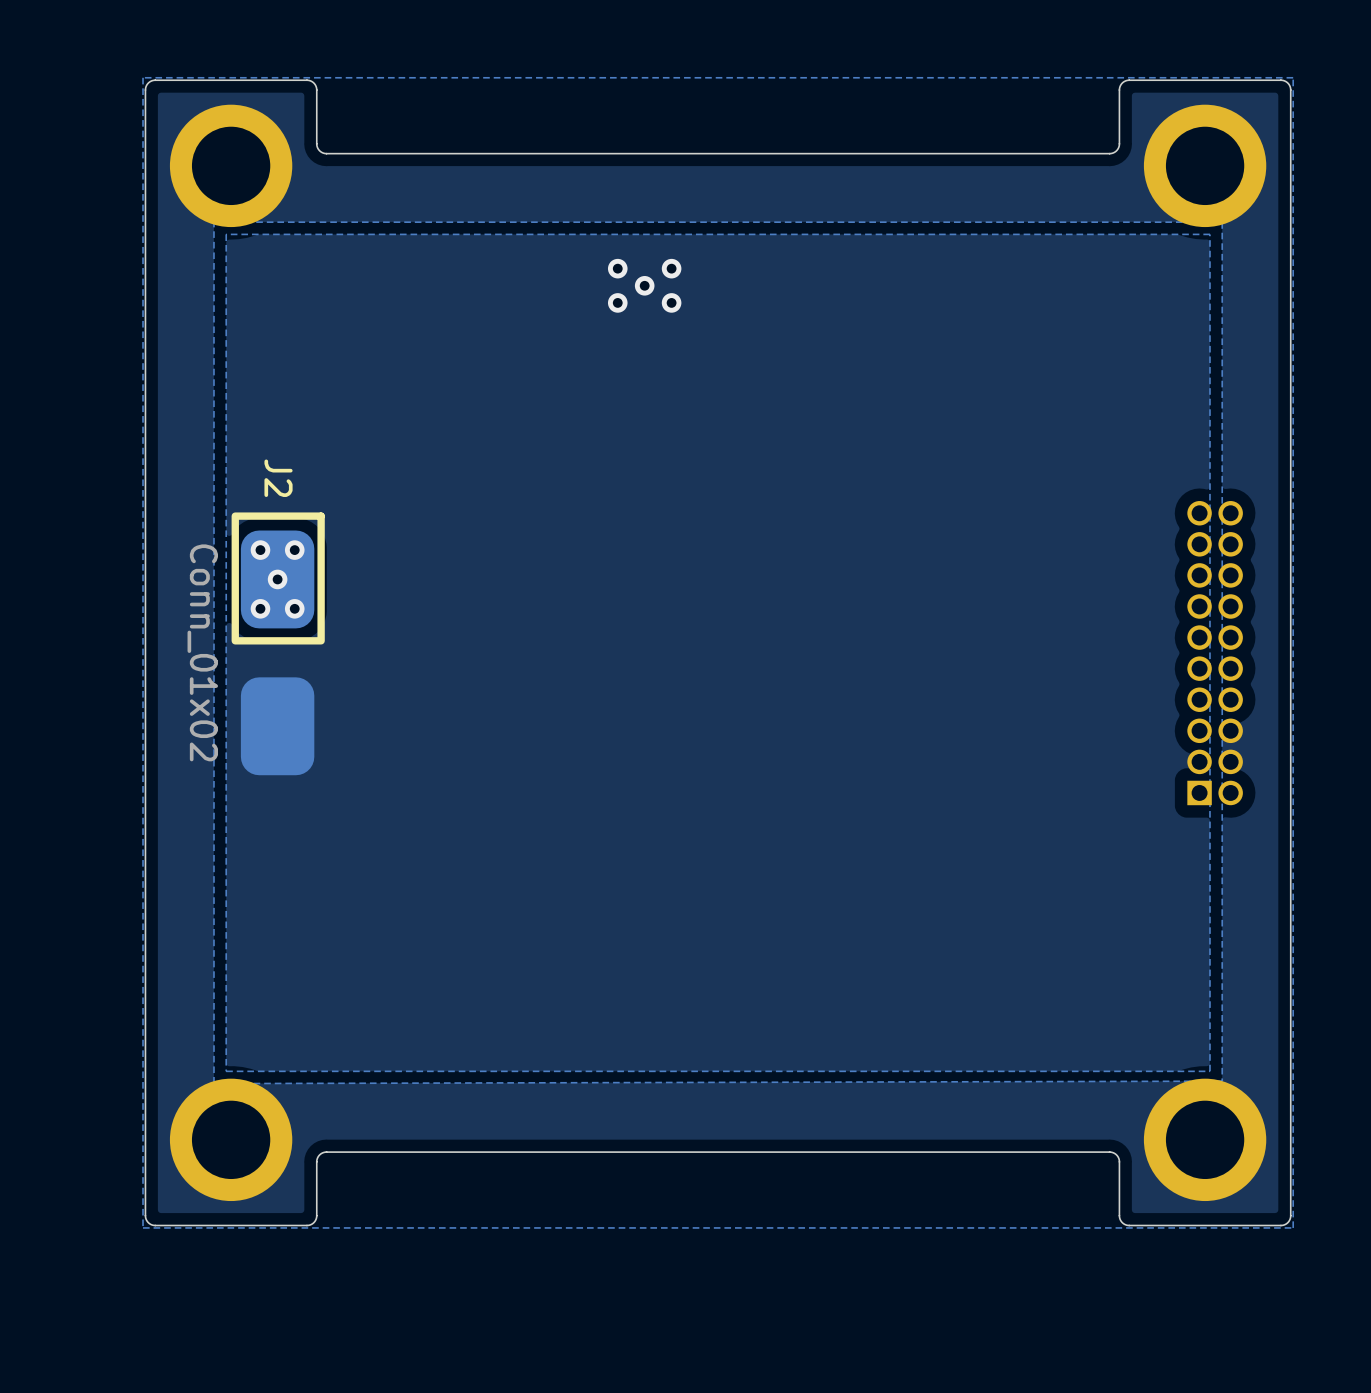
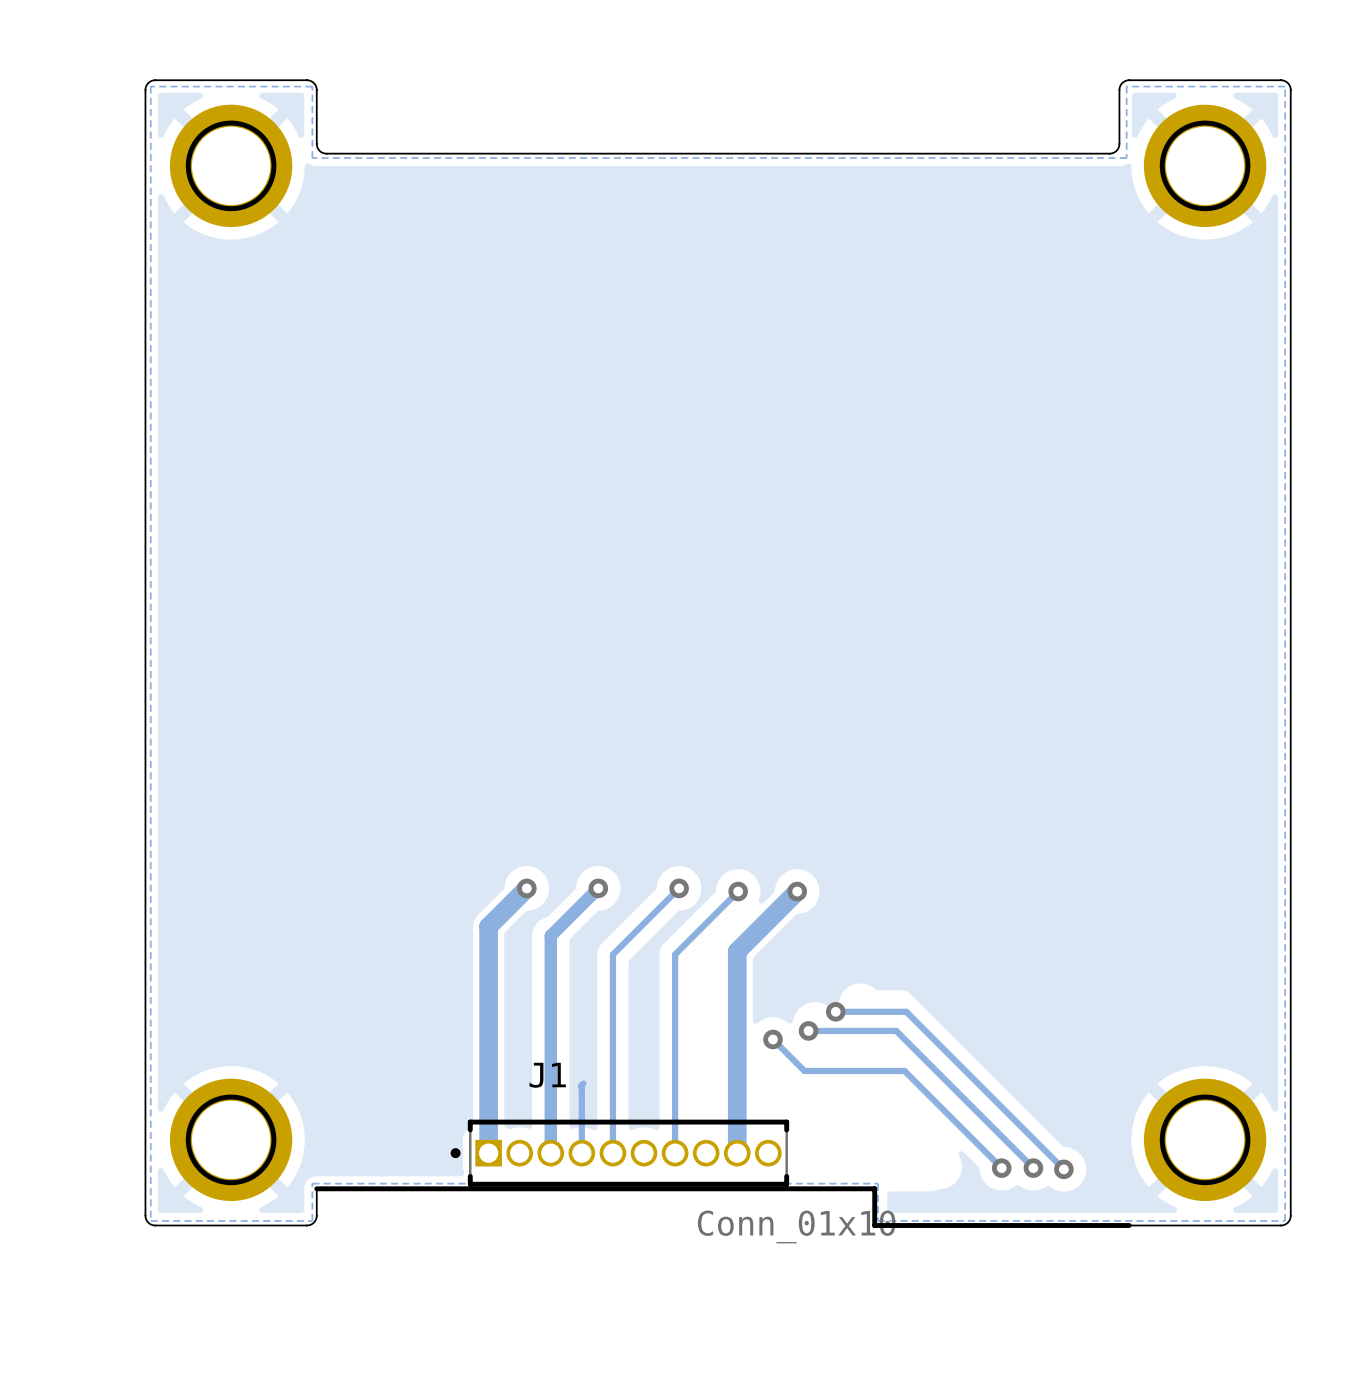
zone outline: (1293, 77) (1293, 1227) (143, 1227) (143, 77) (1293, 77) -> (1285, 86) (1285, 1220) (878, 1220) (878, 1183) (312, 1183) (312, 1220) (150, 1220) (150, 86) (312, 86) (312, 158) (1126, 158) (1126, 86) (1285, 86)
round board edge: none -> [185, 120, 277, 212]
round board edge: none -> [1159, 120, 1251, 212]
zone outline: (1222, 222) (1222, 1081) (213, 1083) (213, 222) (1222, 222) -> none
zone outline: (1209, 234) (1209, 1071) (226, 1071) (226, 234) (1209, 234) -> none
via: (617, 268) -> none
via: (671, 268) -> none
via: (644, 285) -> none
via: (617, 302) -> none
via: (671, 302) -> none
via: (260, 550) -> none
via: (294, 550) -> none
via: (277, 579) -> none
via: (260, 608) -> none
via: (294, 608) -> none
J2: Conn_01x02 (278, 643) -> none
part: (1215, 653) -> none
track: none -> (526, 888) (488, 926) (488, 1153)
via: none -> (526, 888)
track: none -> (598, 888) (550, 935) (550, 1153)
via: none -> (598, 888)
track: none -> (679, 888) (612, 954) (612, 1153)
via: none -> (679, 888)
track: none -> (738, 891) (675, 954) (675, 1153)
via: none -> (738, 891)
track: none -> (797, 891) (737, 951) (737, 1153)
via: none -> (797, 891)
track: none -> (835, 1011) (906, 1011) (1063, 1169)
via: none -> (835, 1011)
track: none -> (808, 1030) (896, 1030) (1033, 1168)
via: none -> (808, 1030)
track: none -> (773, 1039) (804, 1070) (904, 1070) (1001, 1168)
via: none -> (773, 1039)
track: none -> (583, 1083) (581, 1087)
track: none -> (581, 1087) (581, 1153)
round board edge: none -> [185, 1094, 277, 1186]
round board edge: none -> [1159, 1094, 1251, 1186]
J1: none -> Conn_01x10 (619, 1153)
via: none -> (1001, 1168)
via: none -> (1033, 1168)
via: none -> (1063, 1169)
board edge: (316, 1188) (317, 1159) (320, 1154) (326, 1152) (1109, 1152) (1115, 1154) (1119, 1159) (1119, 1216) (1123, 1223) (1129, 1225) -> (316, 1188) (874, 1188) (874, 1225) (1129, 1225)

